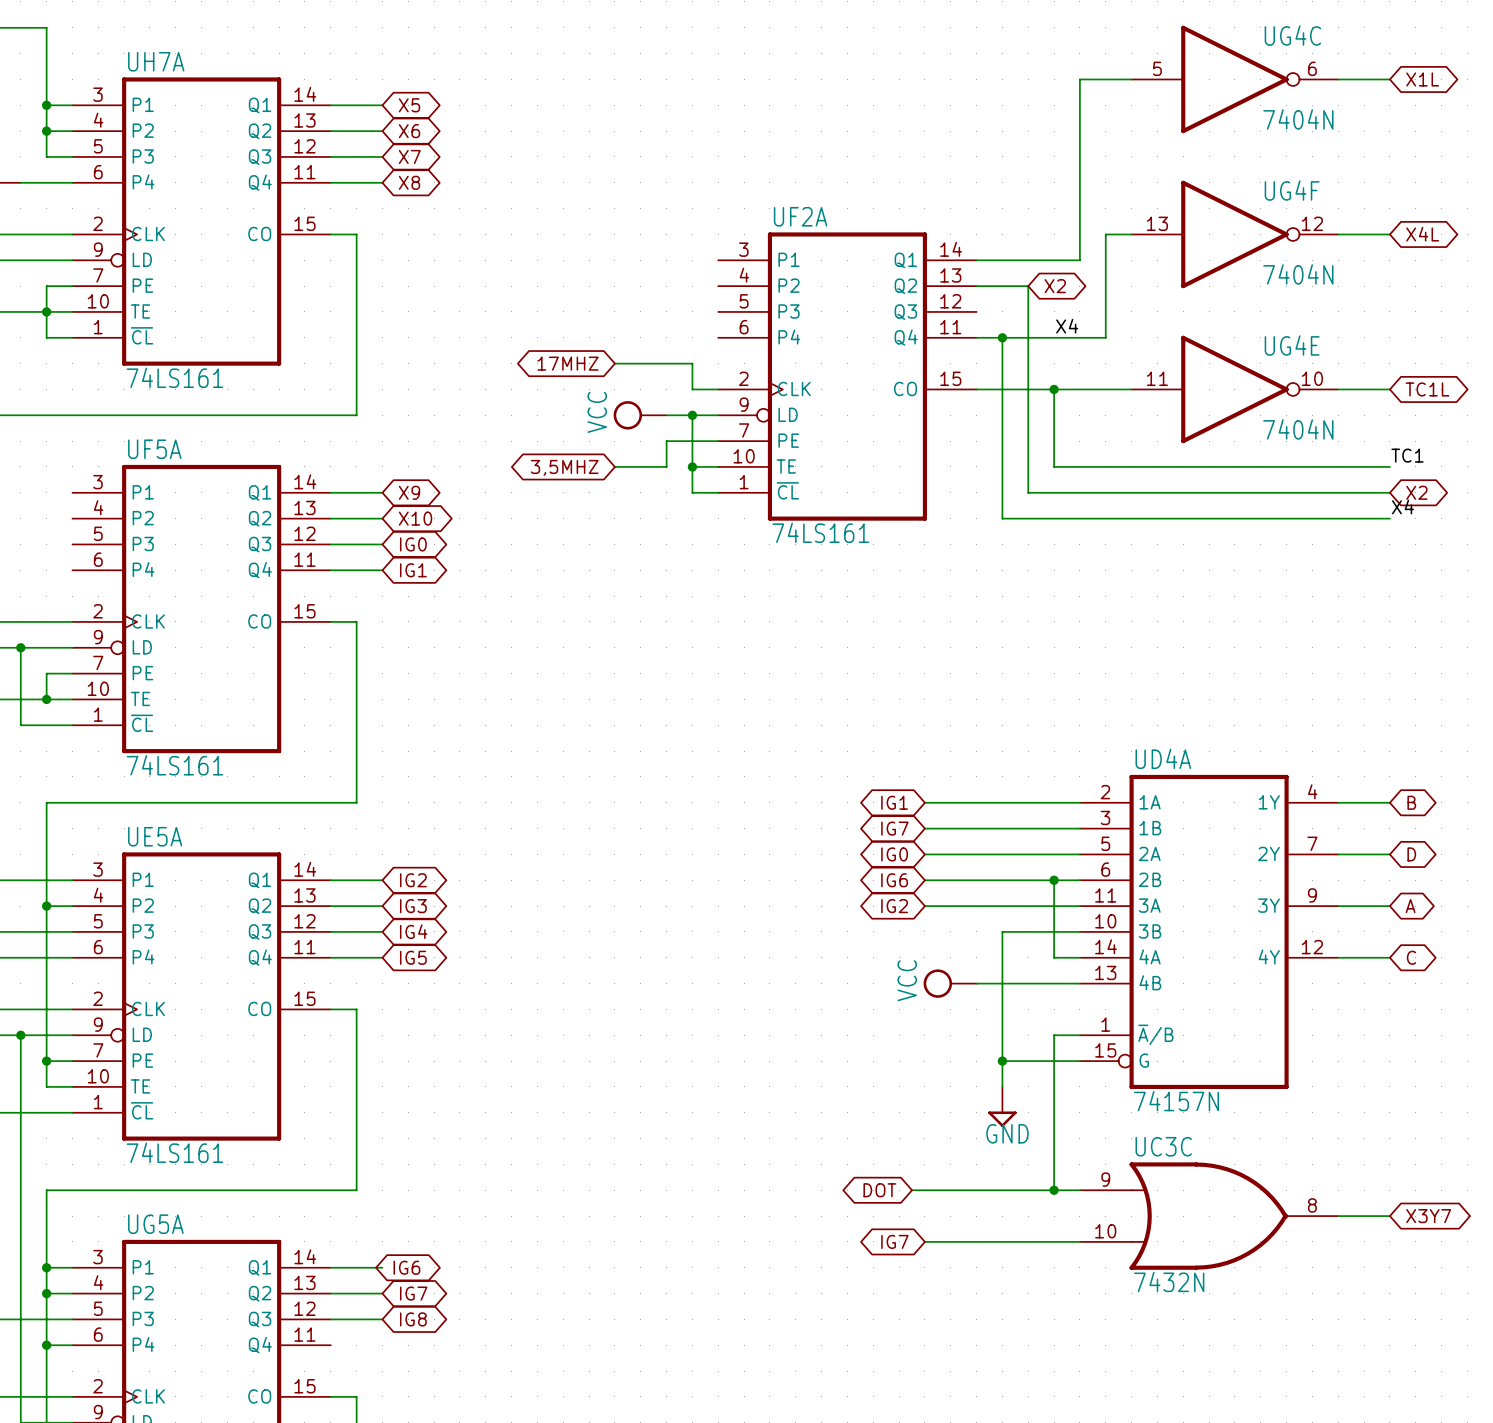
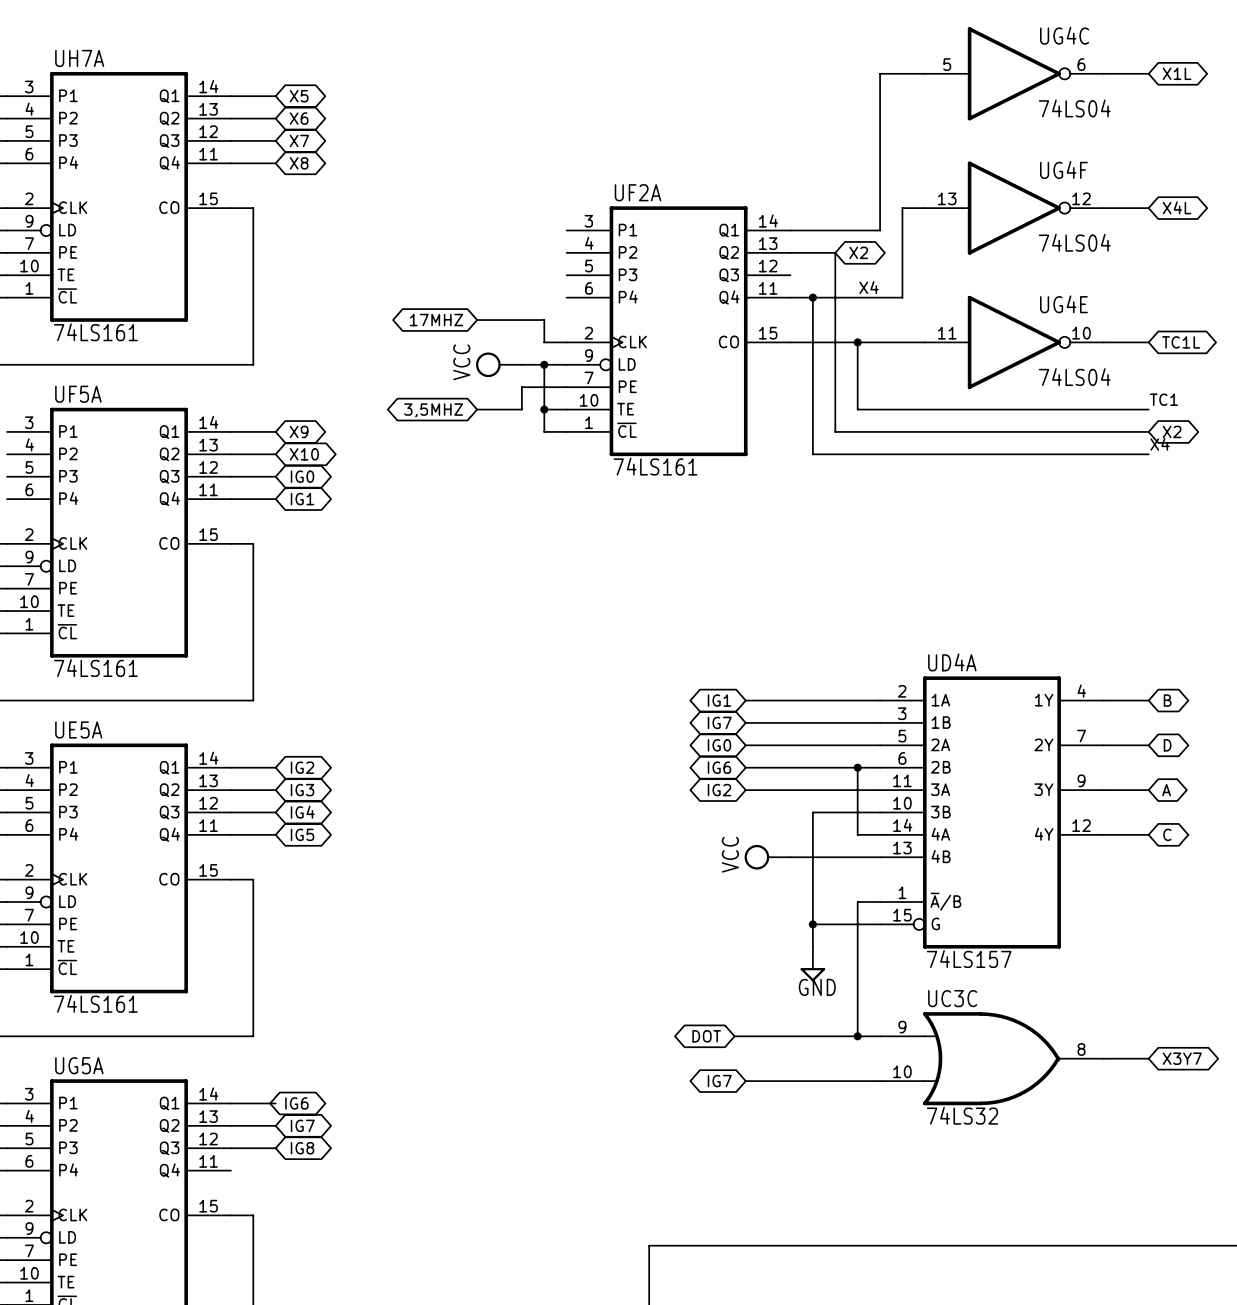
UG4C value: 7404N (1298, 119) -> 74LS04 (1074, 108)
UG4F value: 7404N (1298, 274) -> 74LS04 (1074, 242)
UG4E value: 7404N (1298, 429) -> 74LS04 (1074, 377)
UD4A value: 74157N (1176, 1101) -> 74LS157 (969, 959)
UC3C value: 7432N (1169, 1281) -> 74LS32 (962, 1115)

